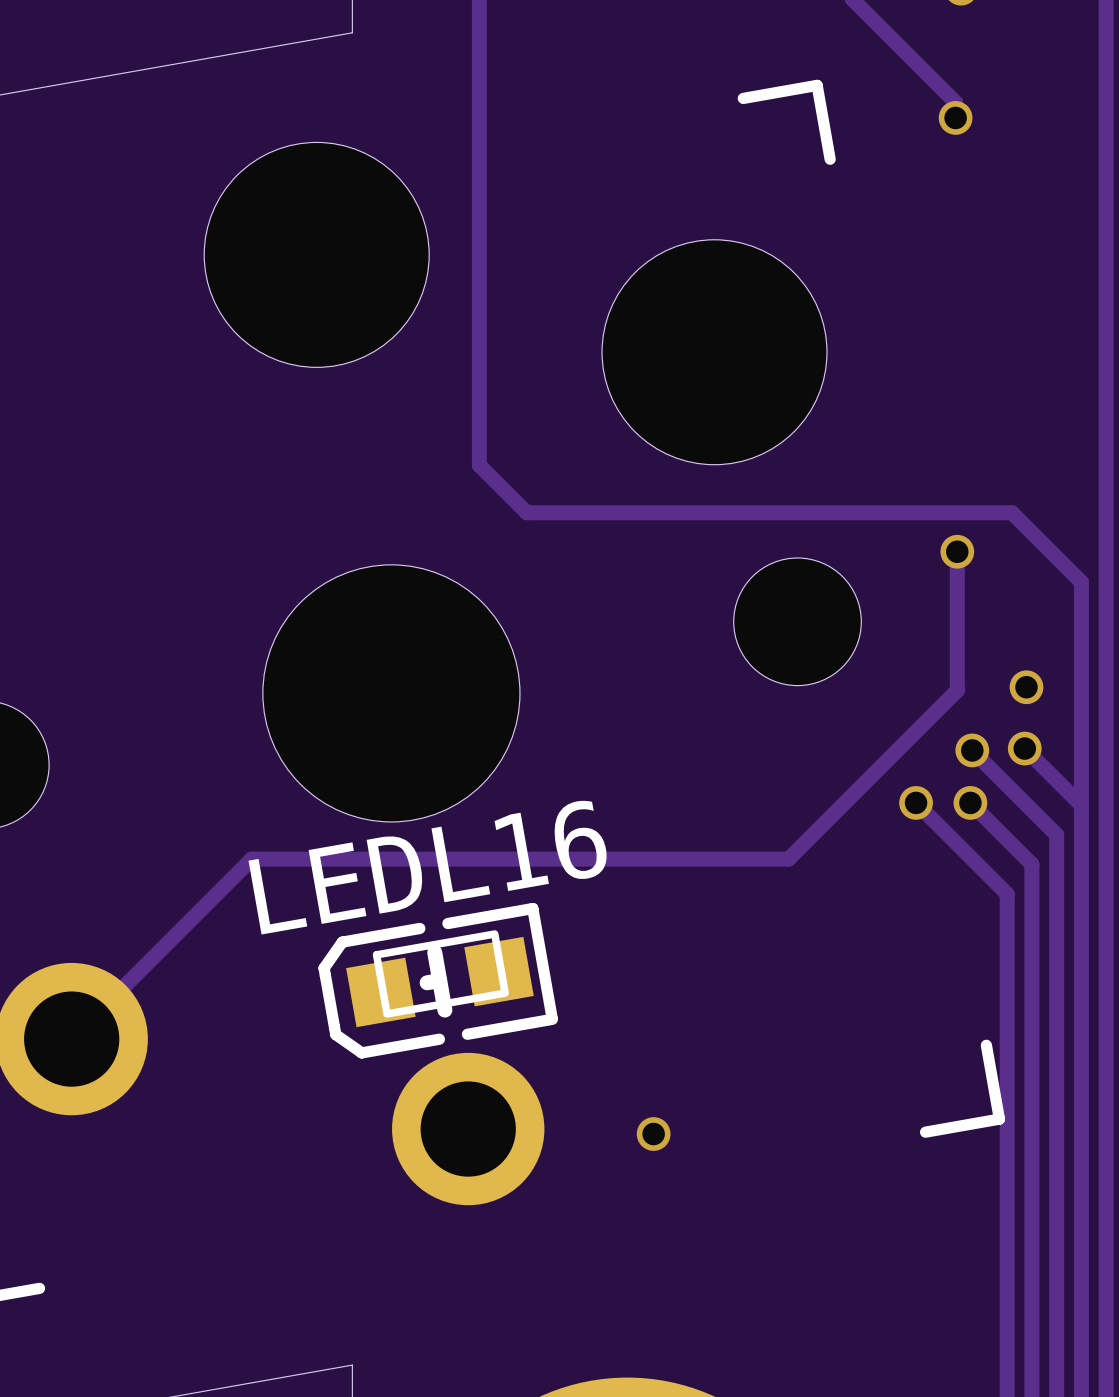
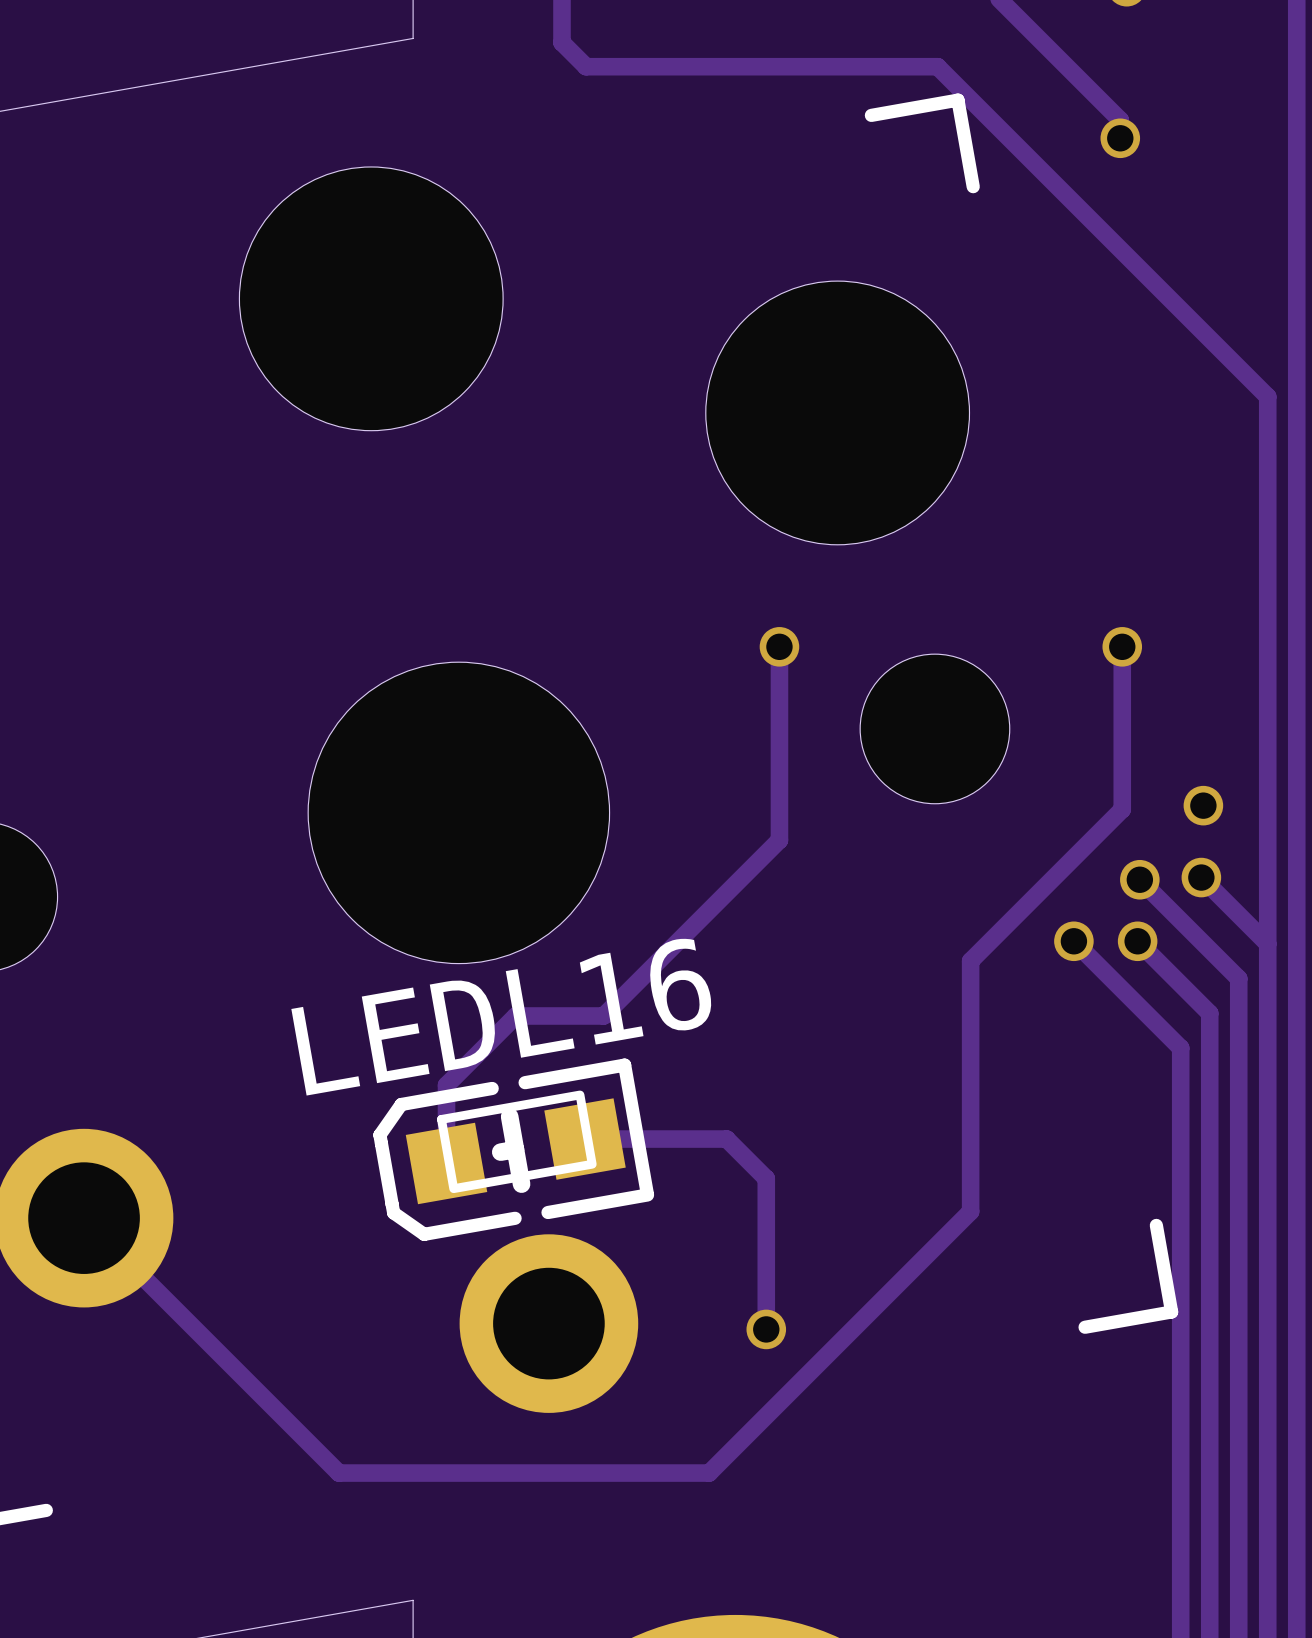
track: (479, 36) (479, 465) (526, 512) (1012, 512) (1081, 582) -> (561, 42) (586, 66) (937, 66) (1267, 396) (1267, 682)
track: none -> (779, 646) (779, 840) (603, 1015) (515, 1015) (446, 1085) (446, 1163)
via: none -> (779, 646)
track: (827, 819) (788, 859) (251, 859) (71, 1039) -> (970, 961) (970, 1211) (709, 1473) (338, 1473) (84, 1218)
track: none -> (585, 1139) (726, 1139) (766, 1178) (766, 1329)

